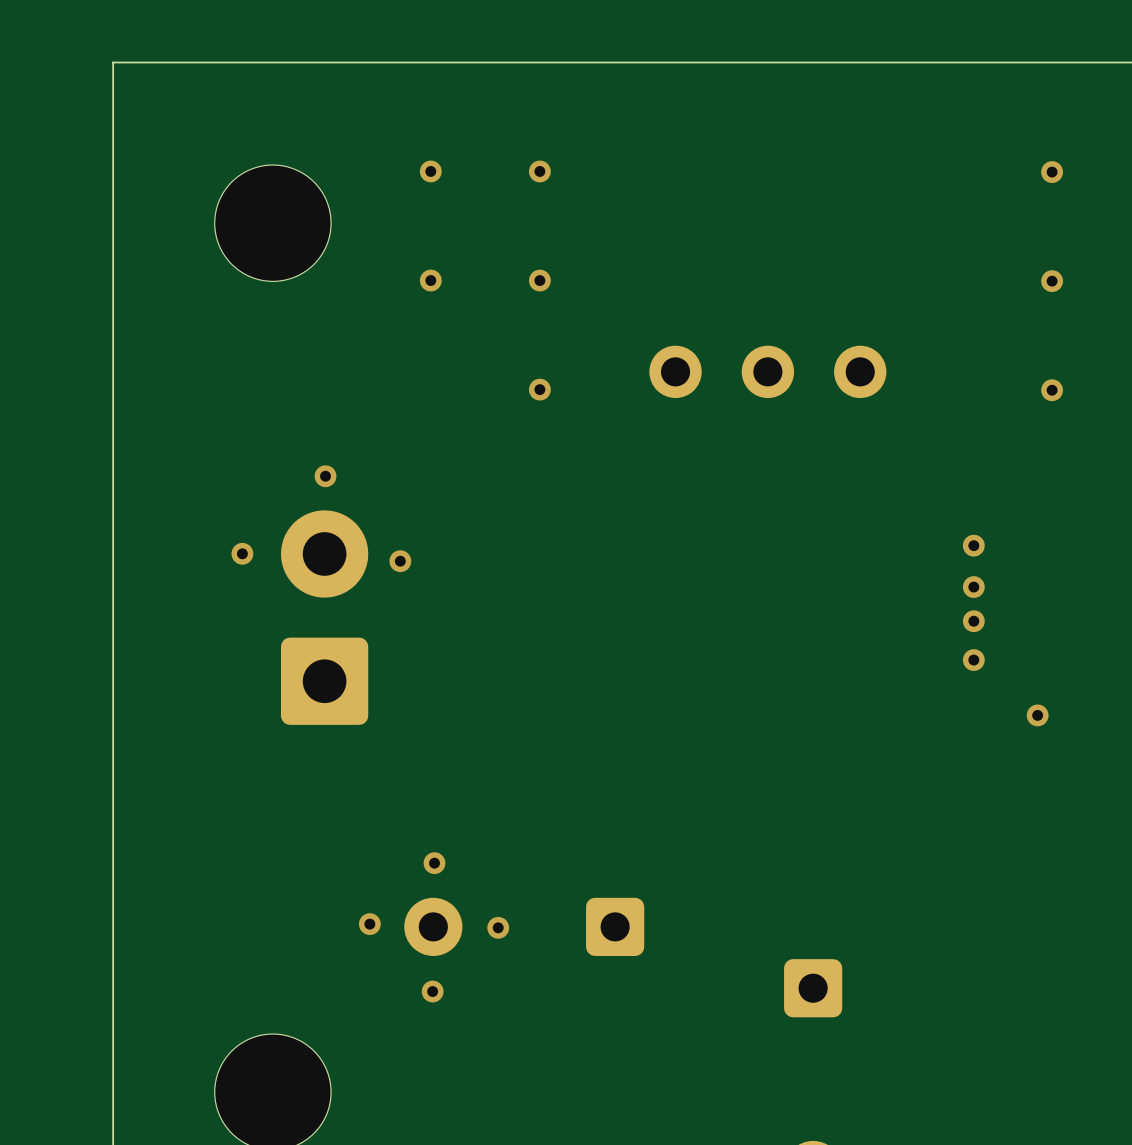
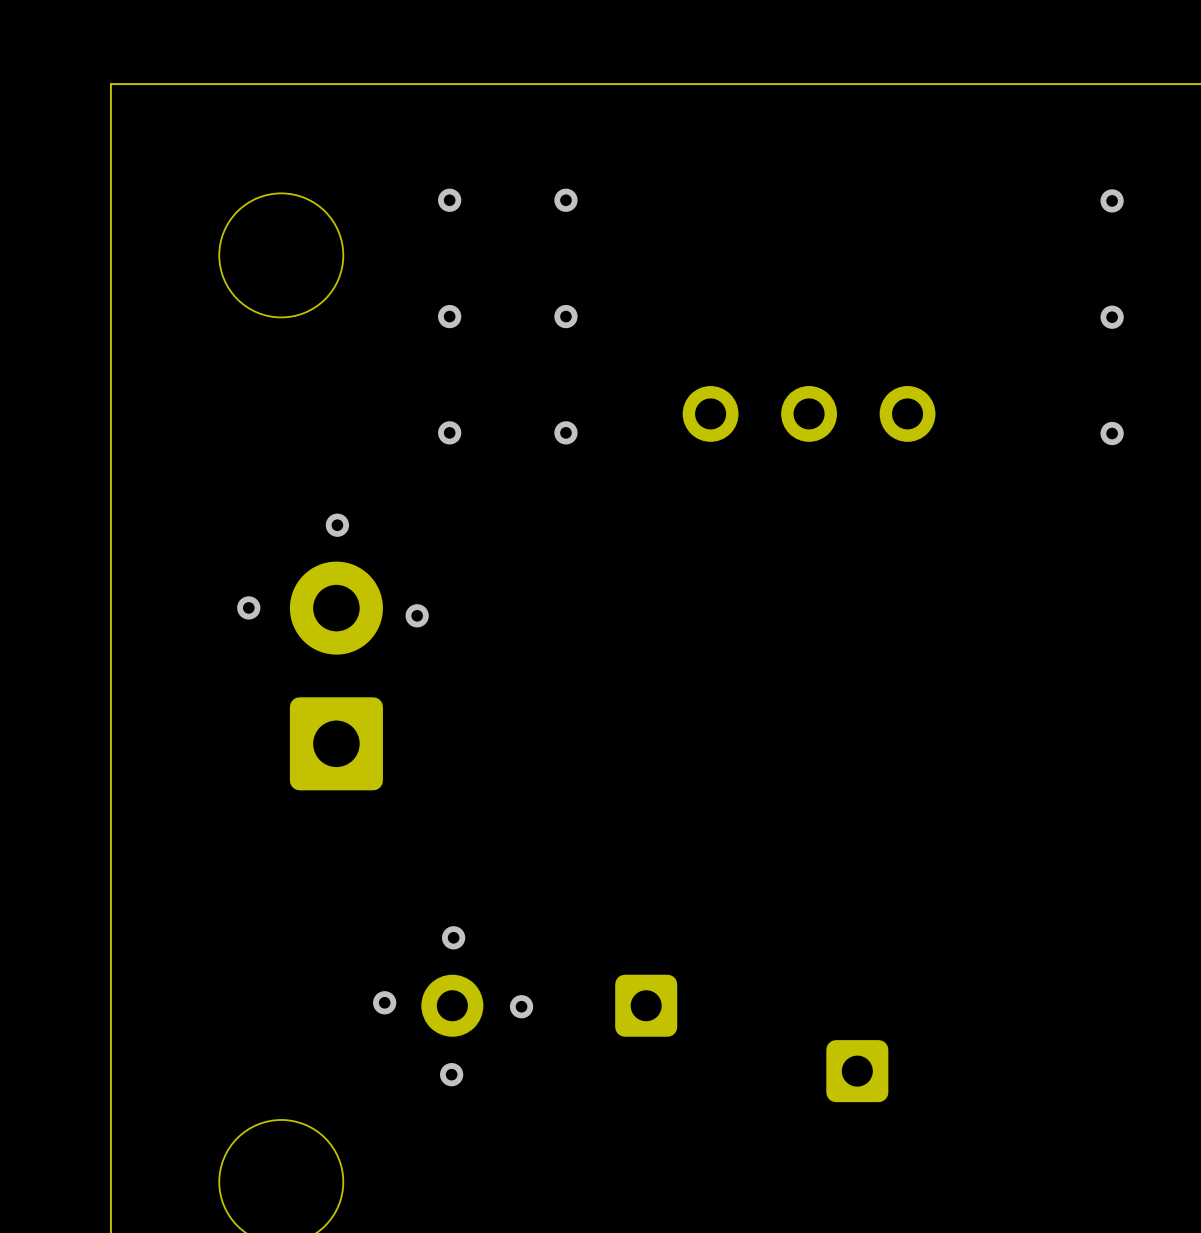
via: none -> (449, 432)
via: (973, 545) -> none
via: (973, 587) -> none
via: (973, 621) -> none
via: (973, 660) -> none
via: (1037, 715) -> none

